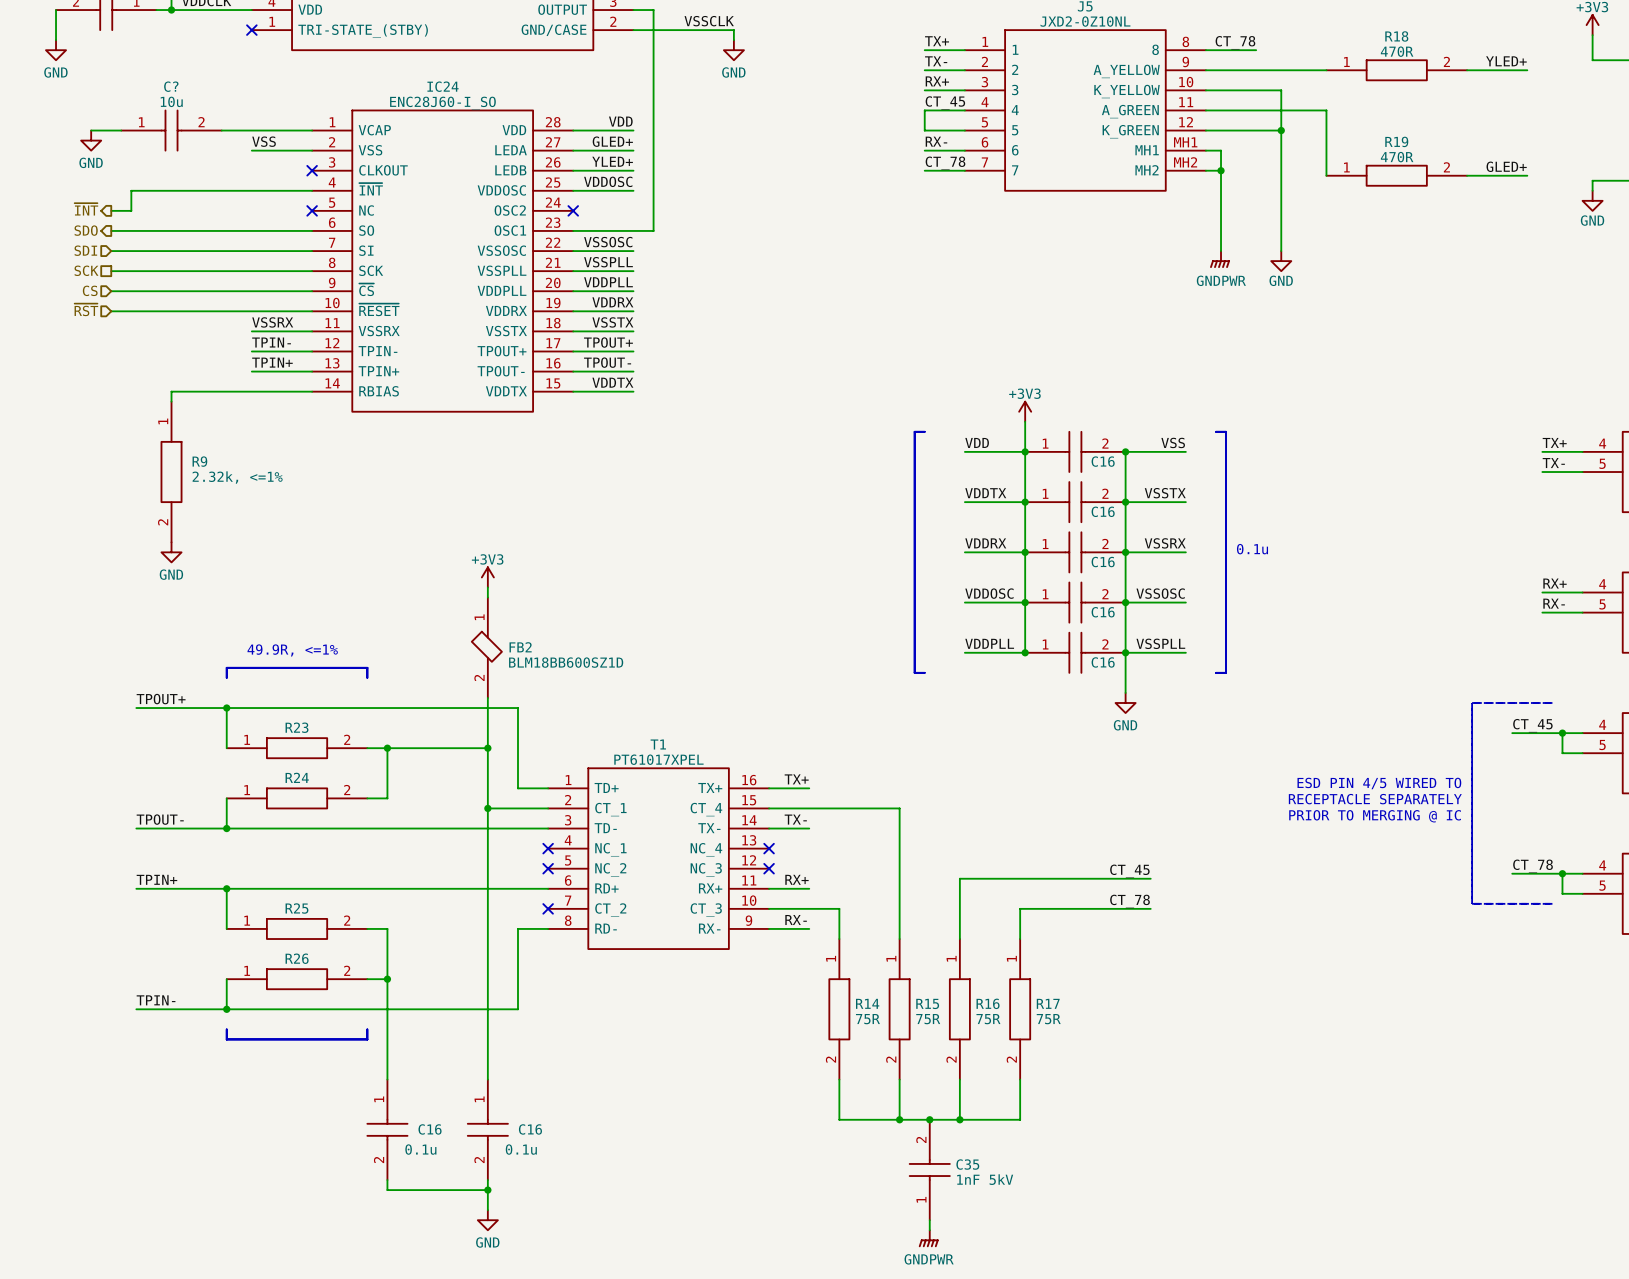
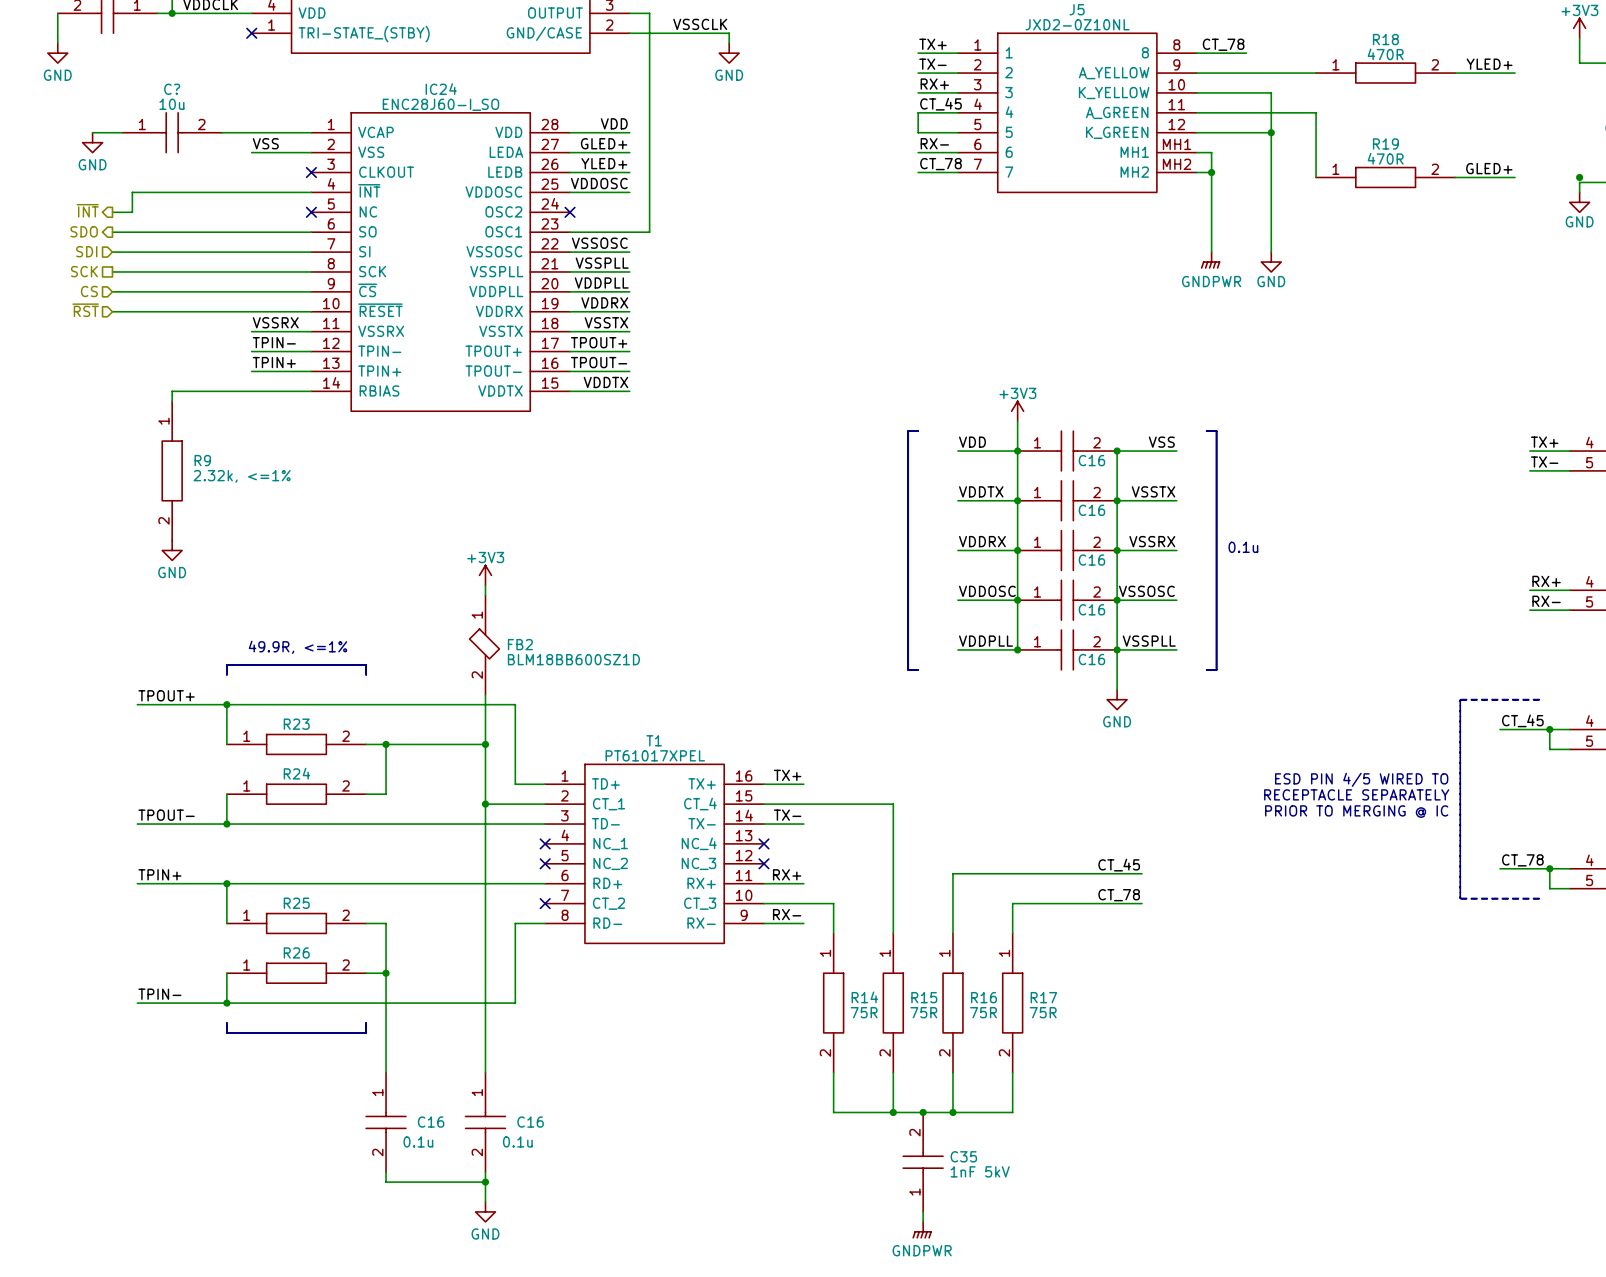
junction: none -> (1579, 177)

